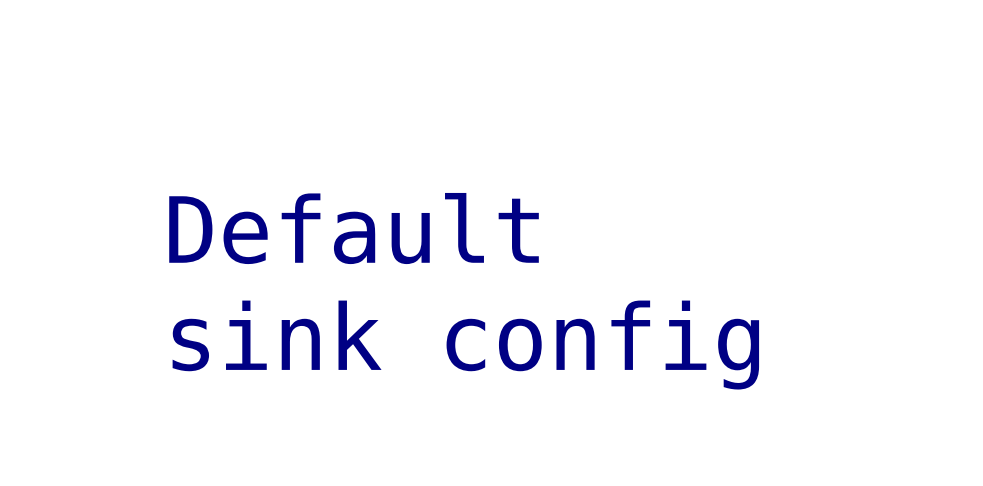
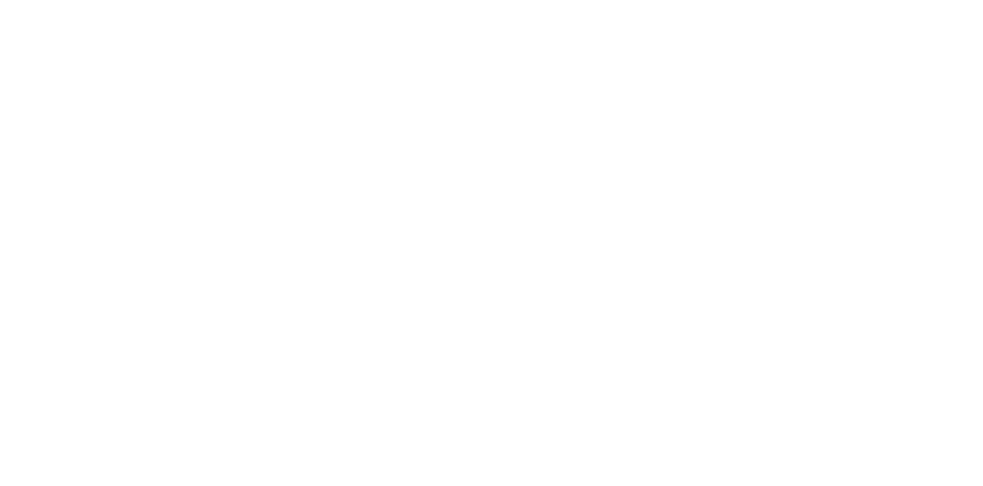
text: Default (354, 228) -> none
text: sink config (465, 345) -> none

